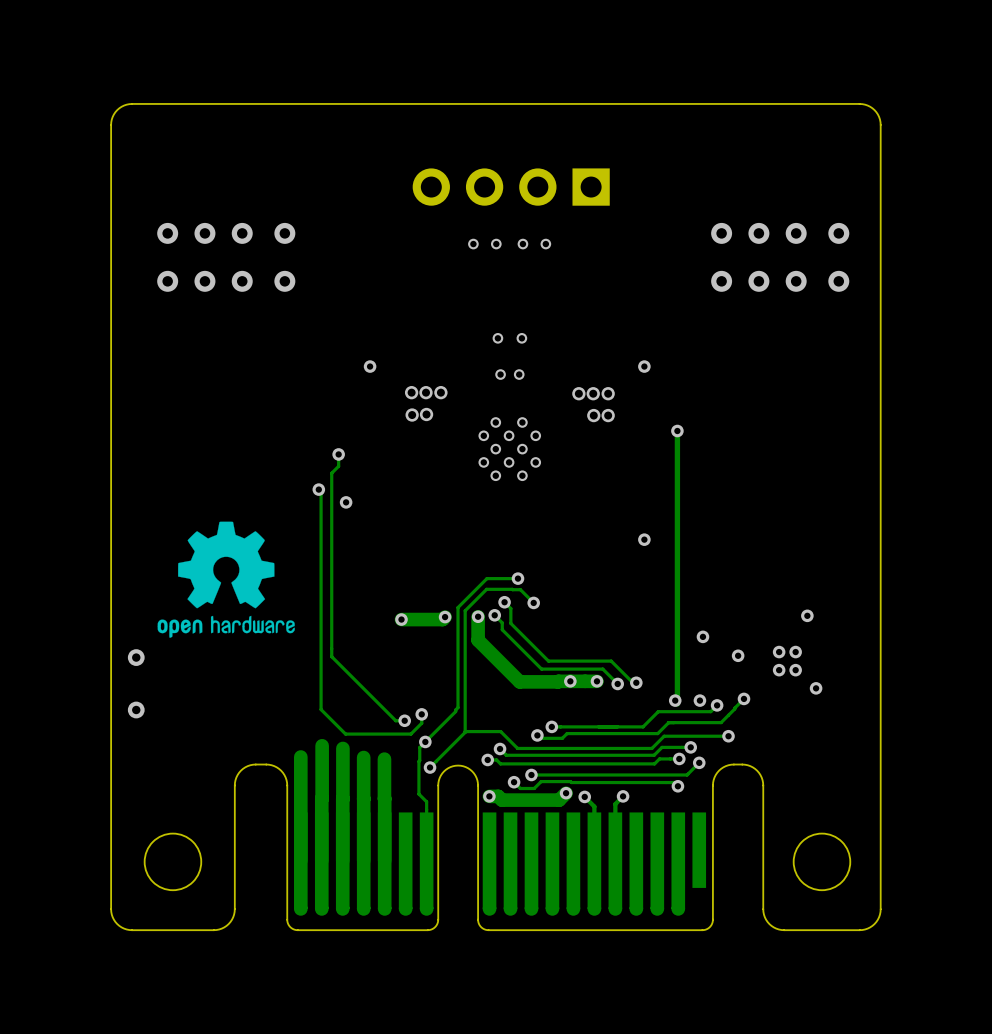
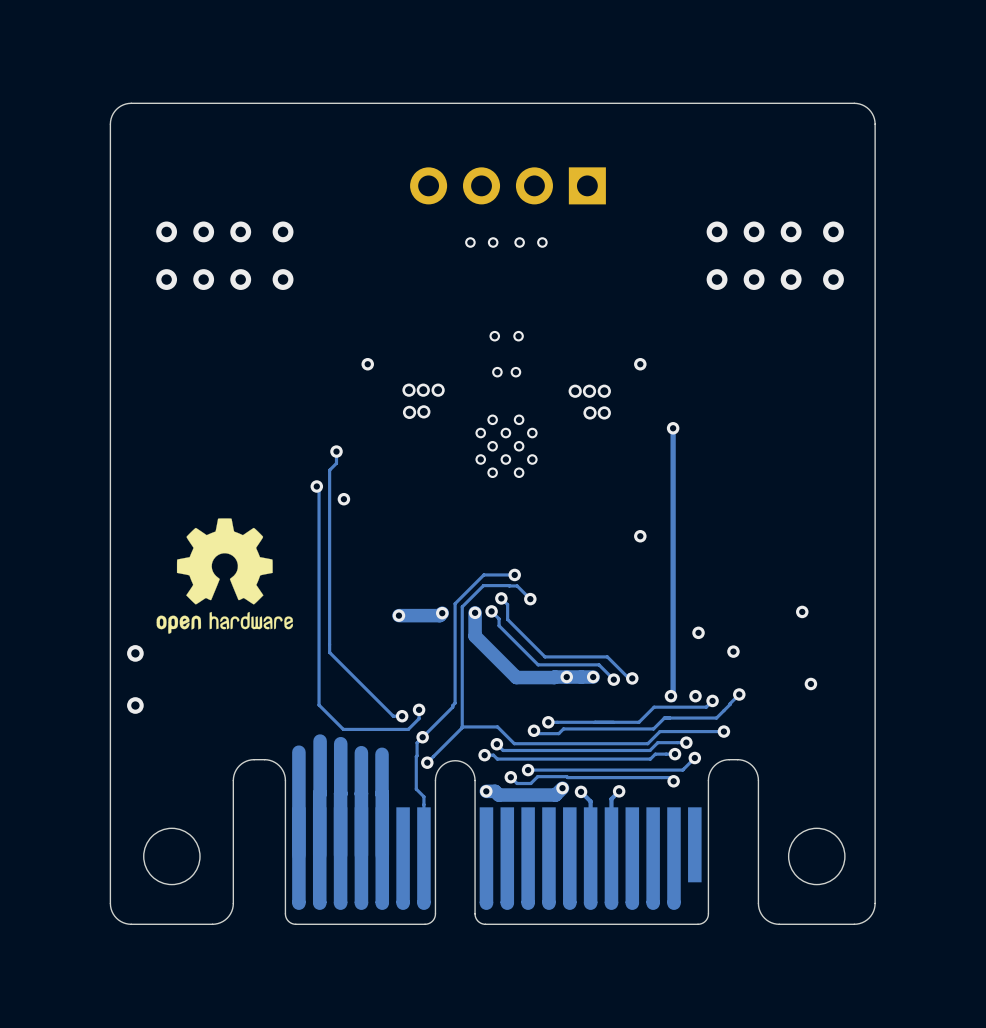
via: (779, 652) -> none
via: (795, 652) -> none
via: (779, 670) -> none
via: (795, 670) -> none

